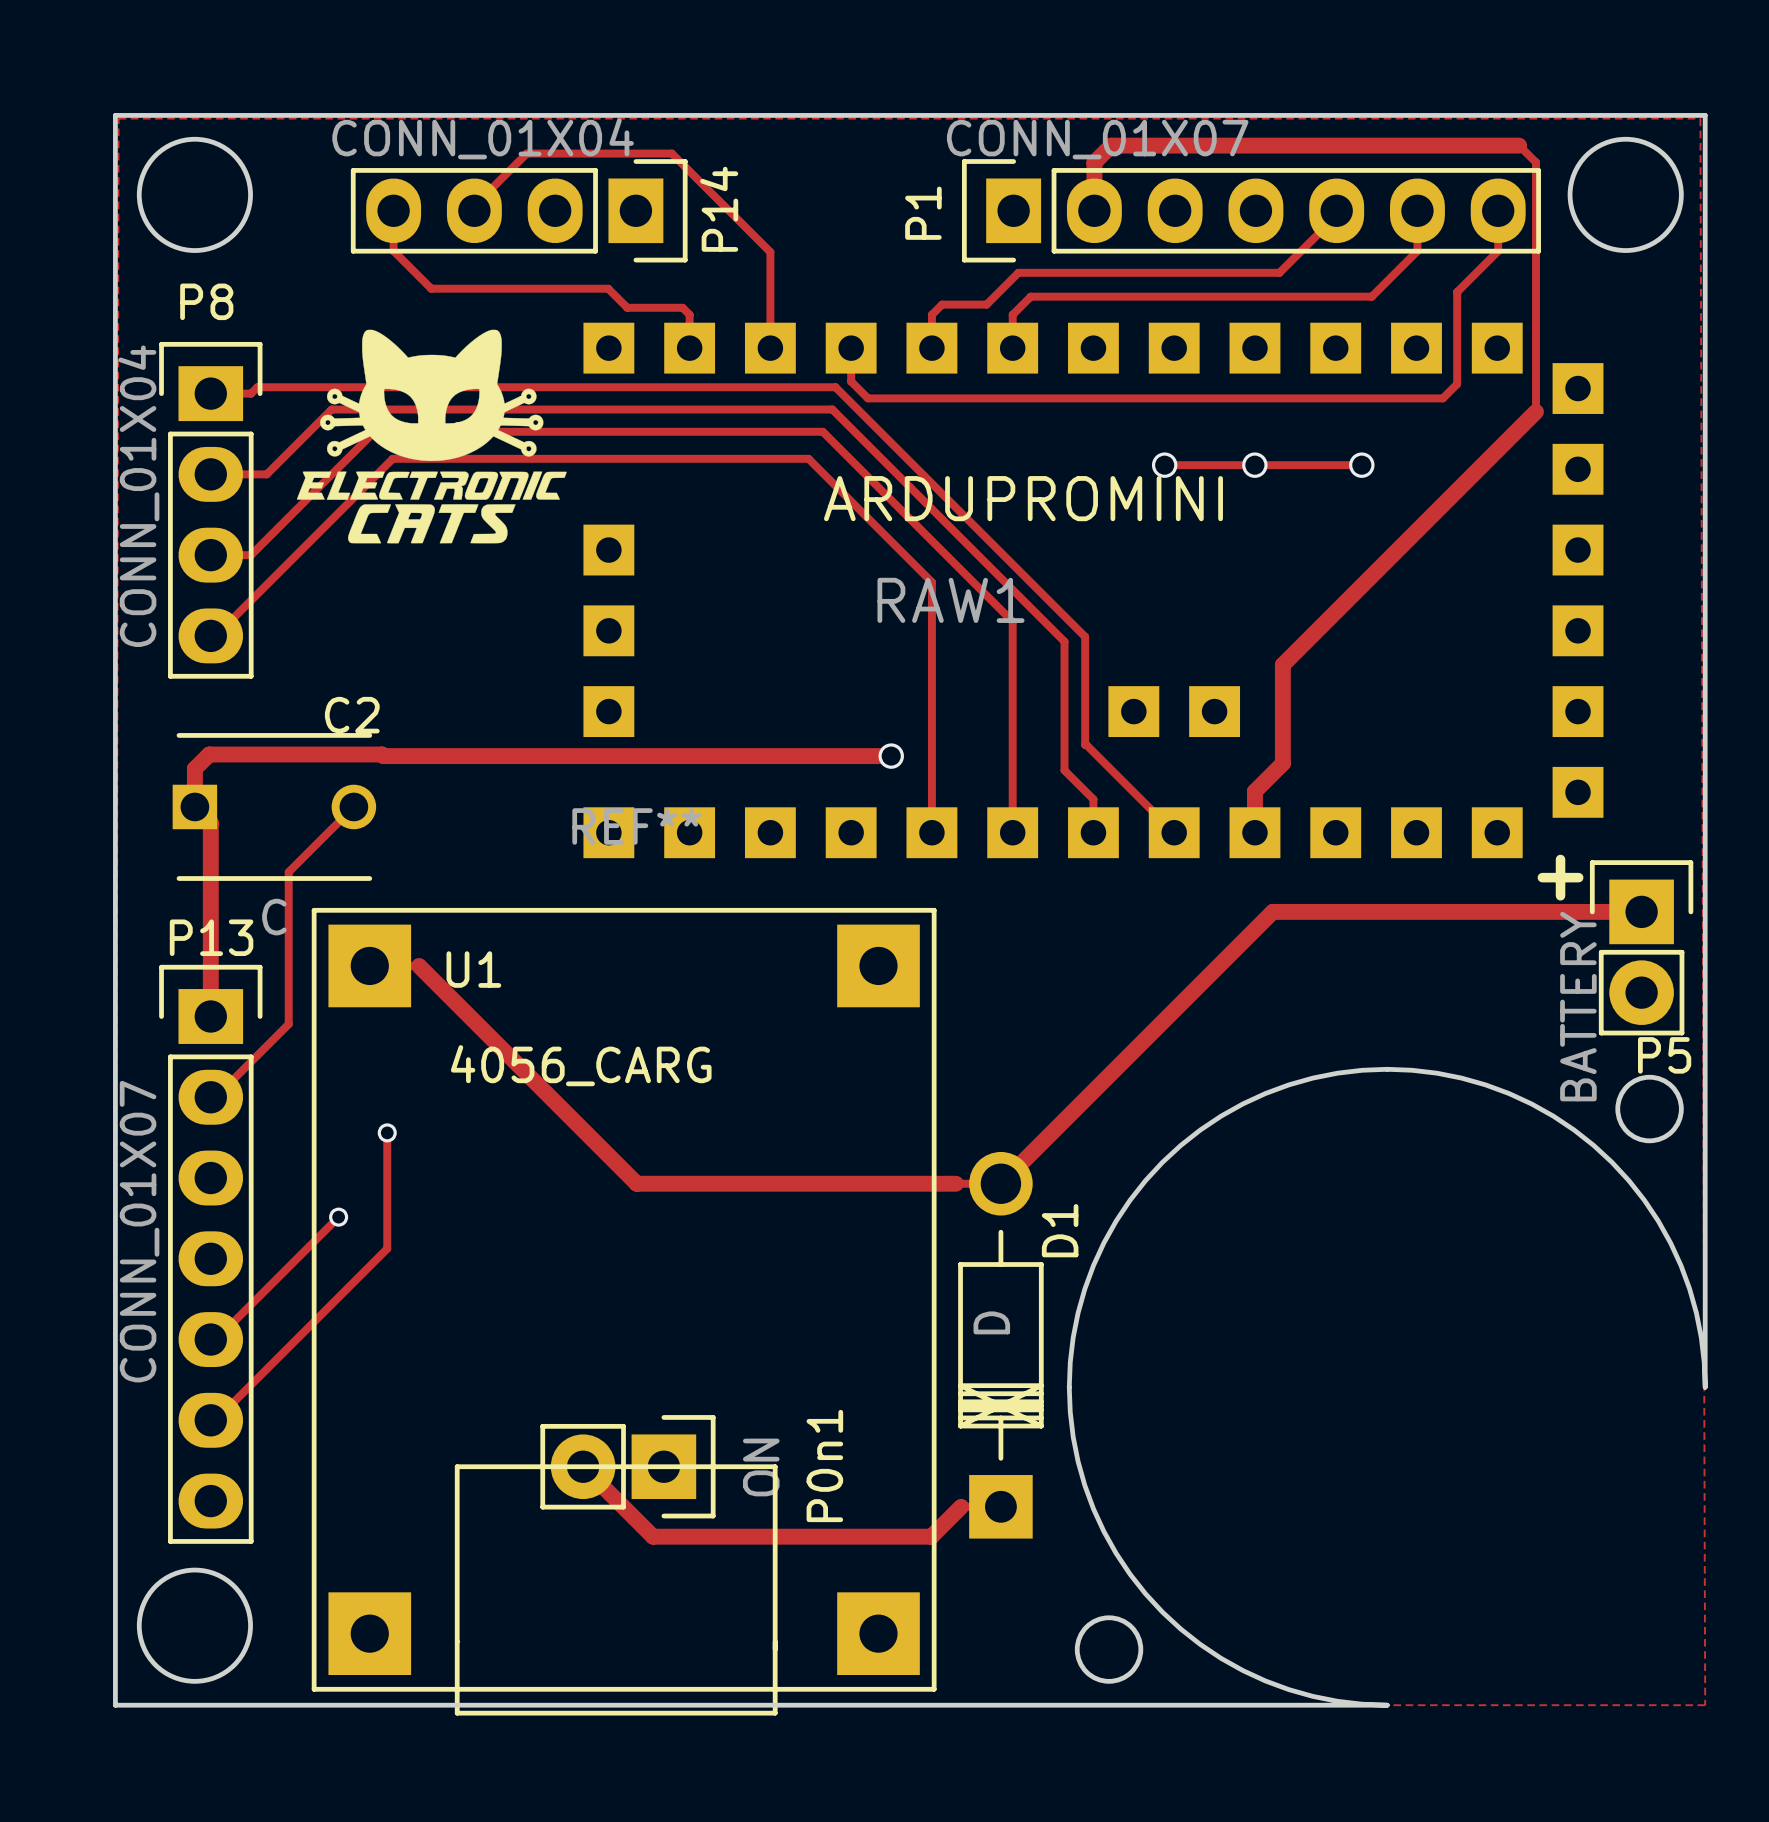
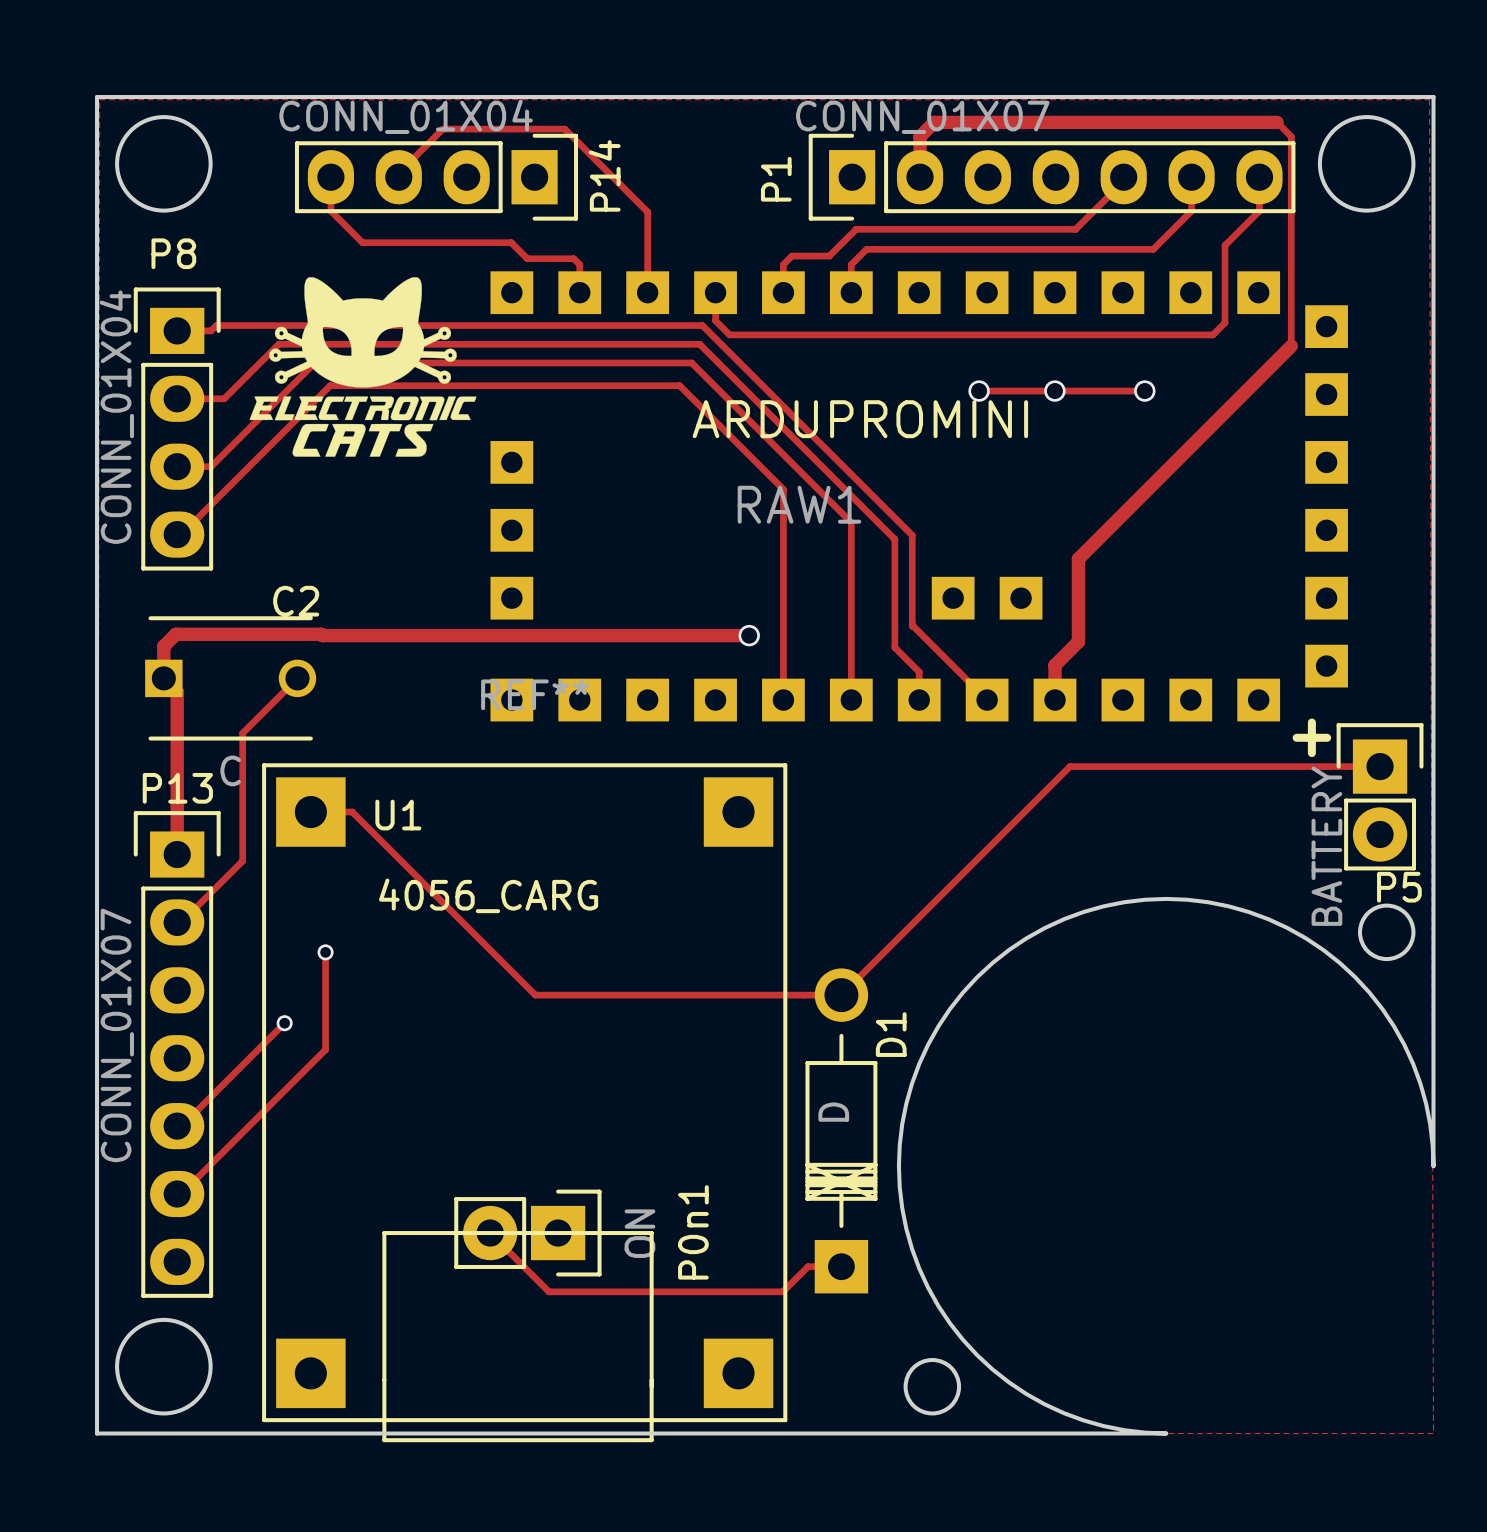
track width: thick (1641, 911) (1272, 911) (1000, 1183) -> thin (1380, 766) (1069, 766) (841, 995)
track width: thick (419, 965) (636, 1183) (955, 1183) -> thin (352, 812) (535, 995) (803, 995)
track width: thick (583, 1466) (653, 1536) (931, 1536) (961, 1506) -> thin (490, 1233) (549, 1291) (782, 1291) (808, 1266)

